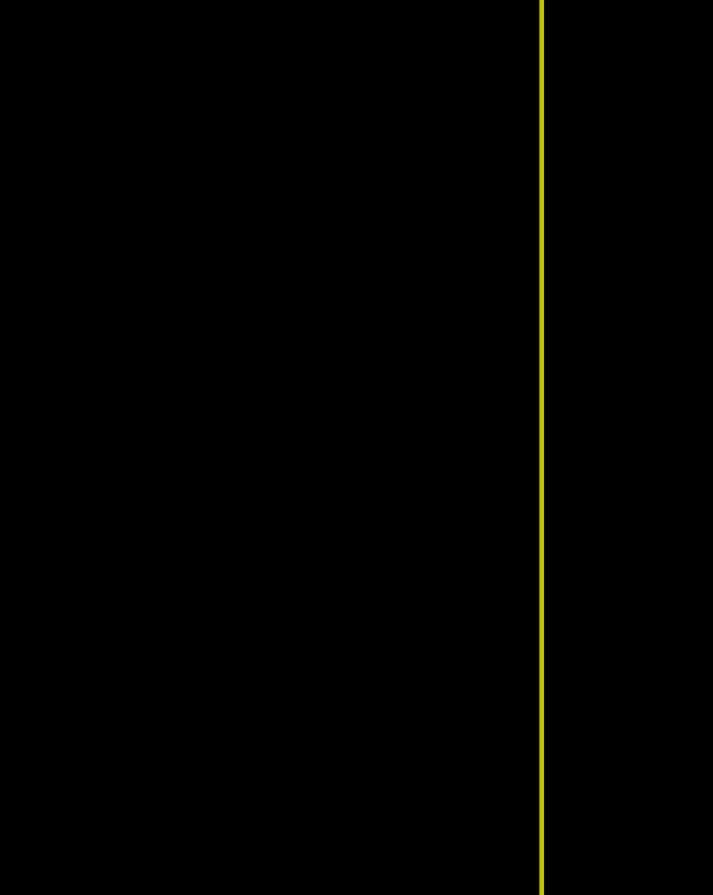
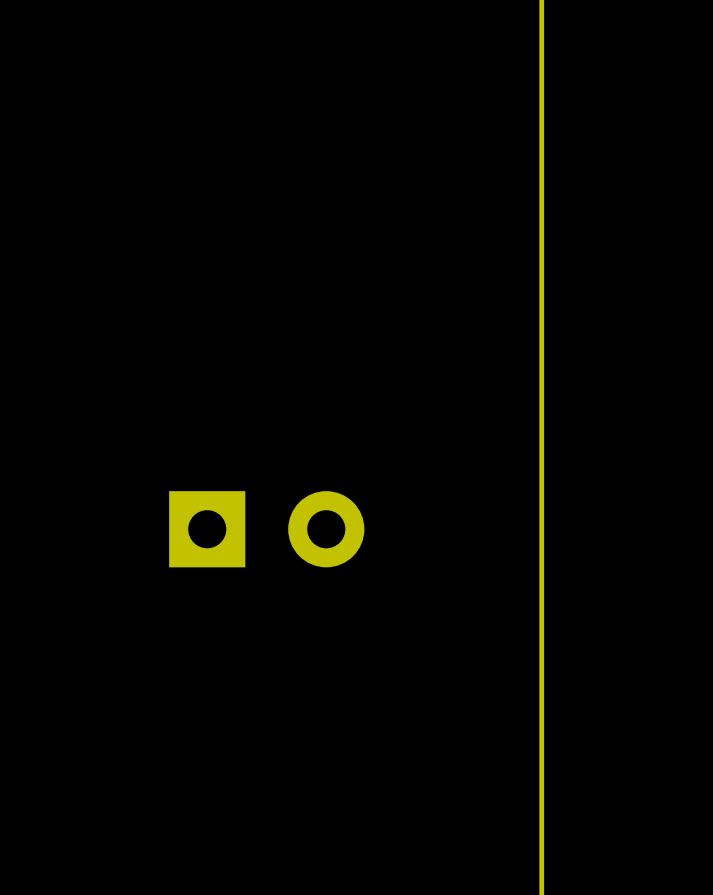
part: none -> (266, 529)

